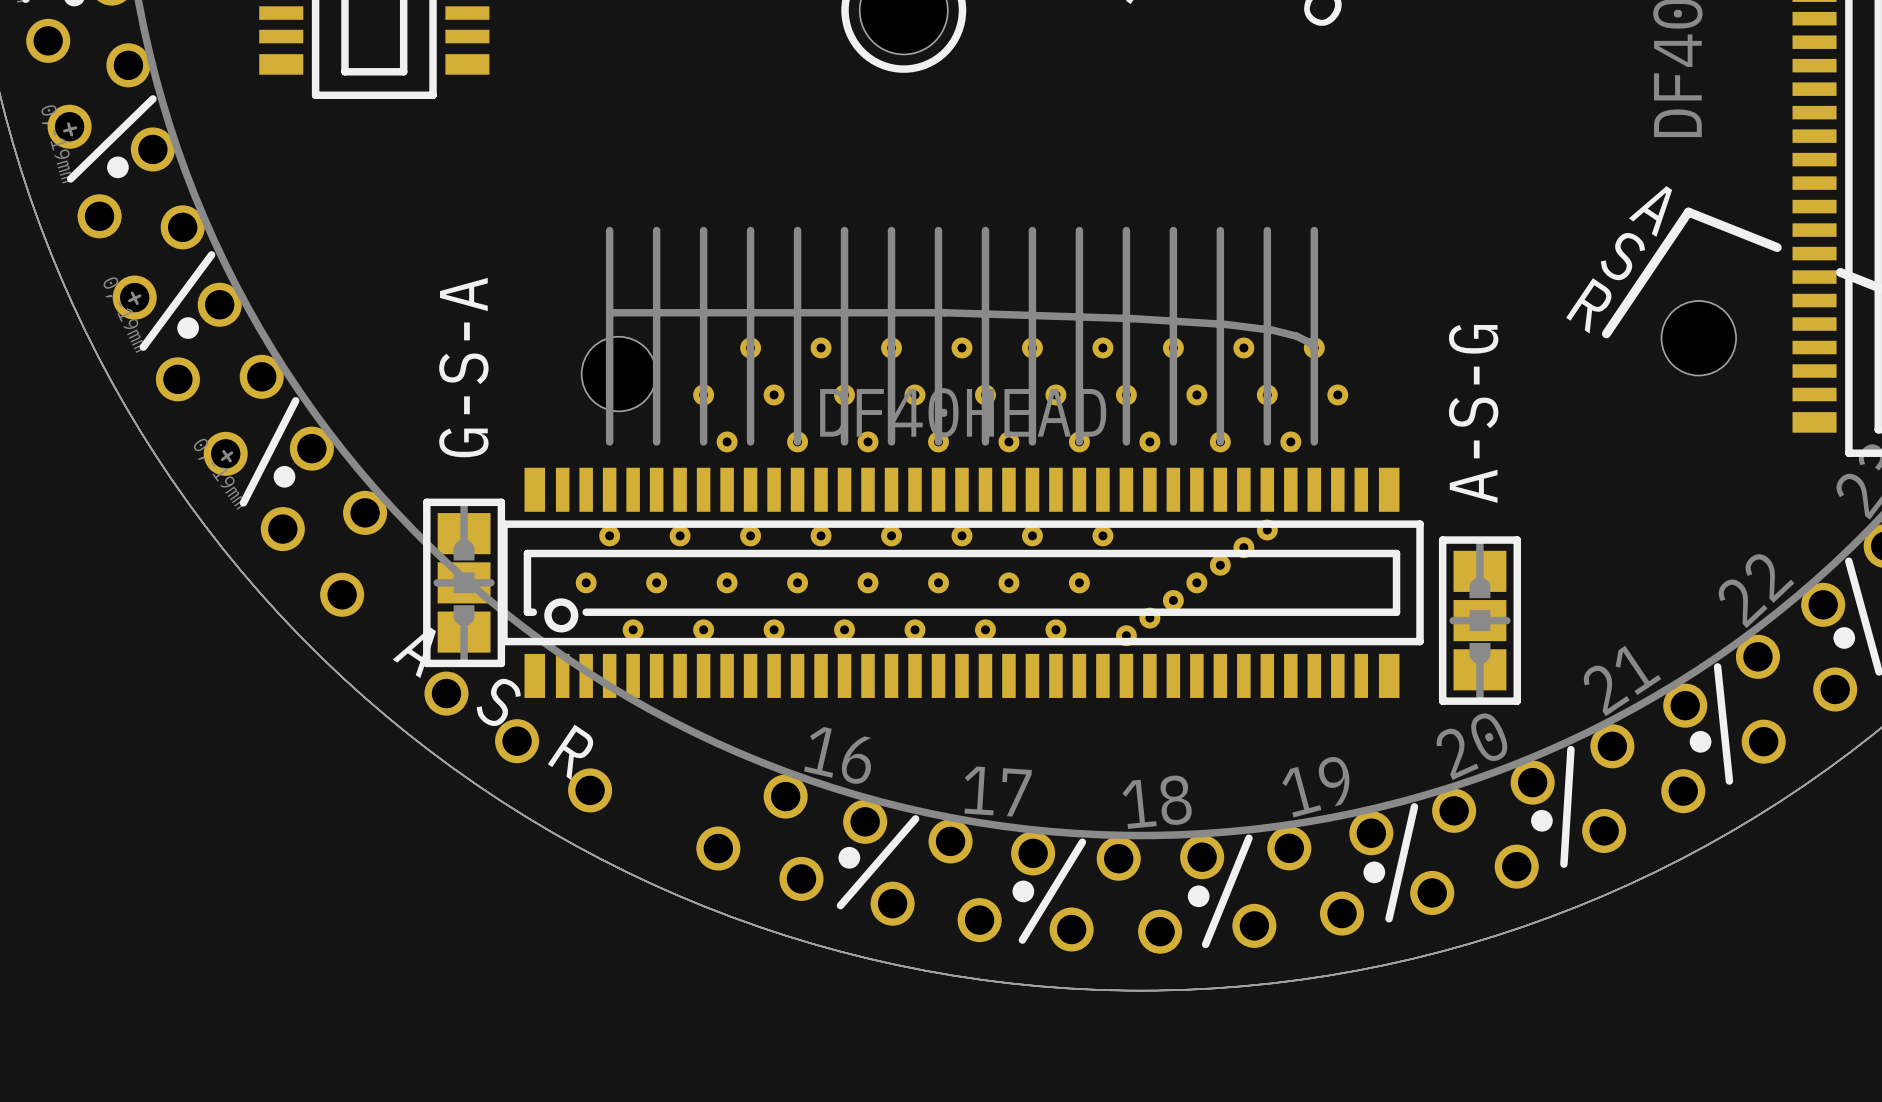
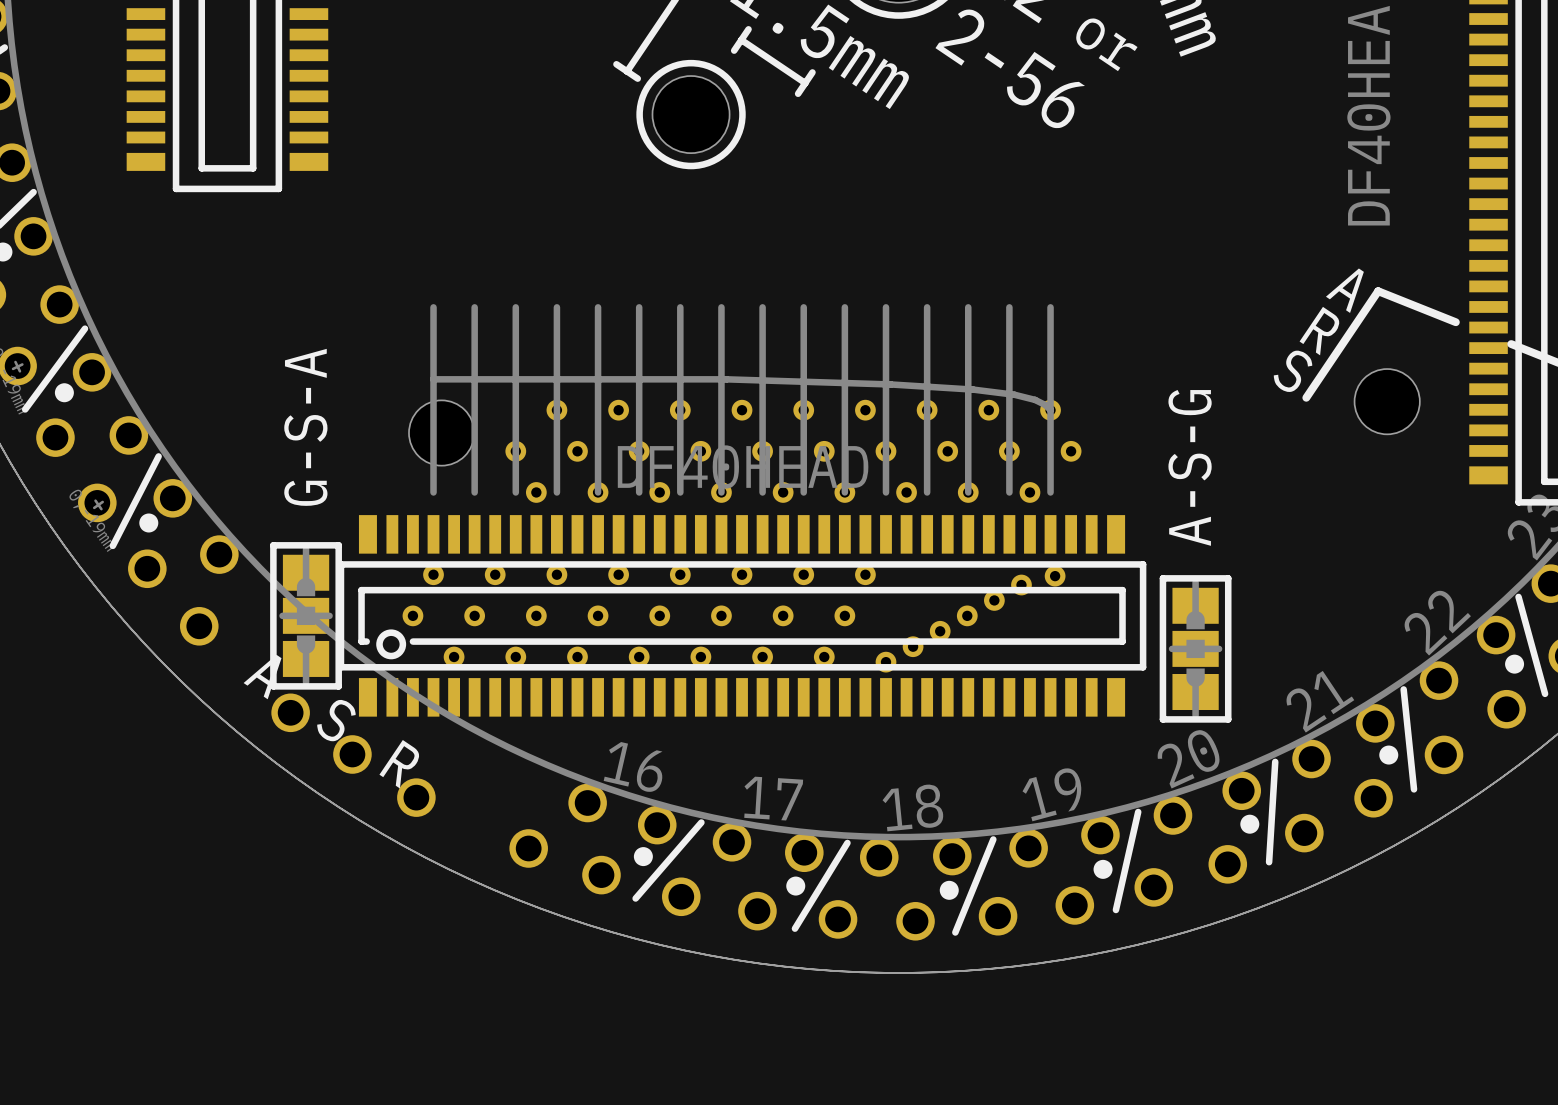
part footprint: [500, 226, 1424, 698] -> [337, 304, 1147, 717]
text position: S (1622, 256) -> S (1293, 371)
text position: R (1589, 305) -> R (1319, 331)

